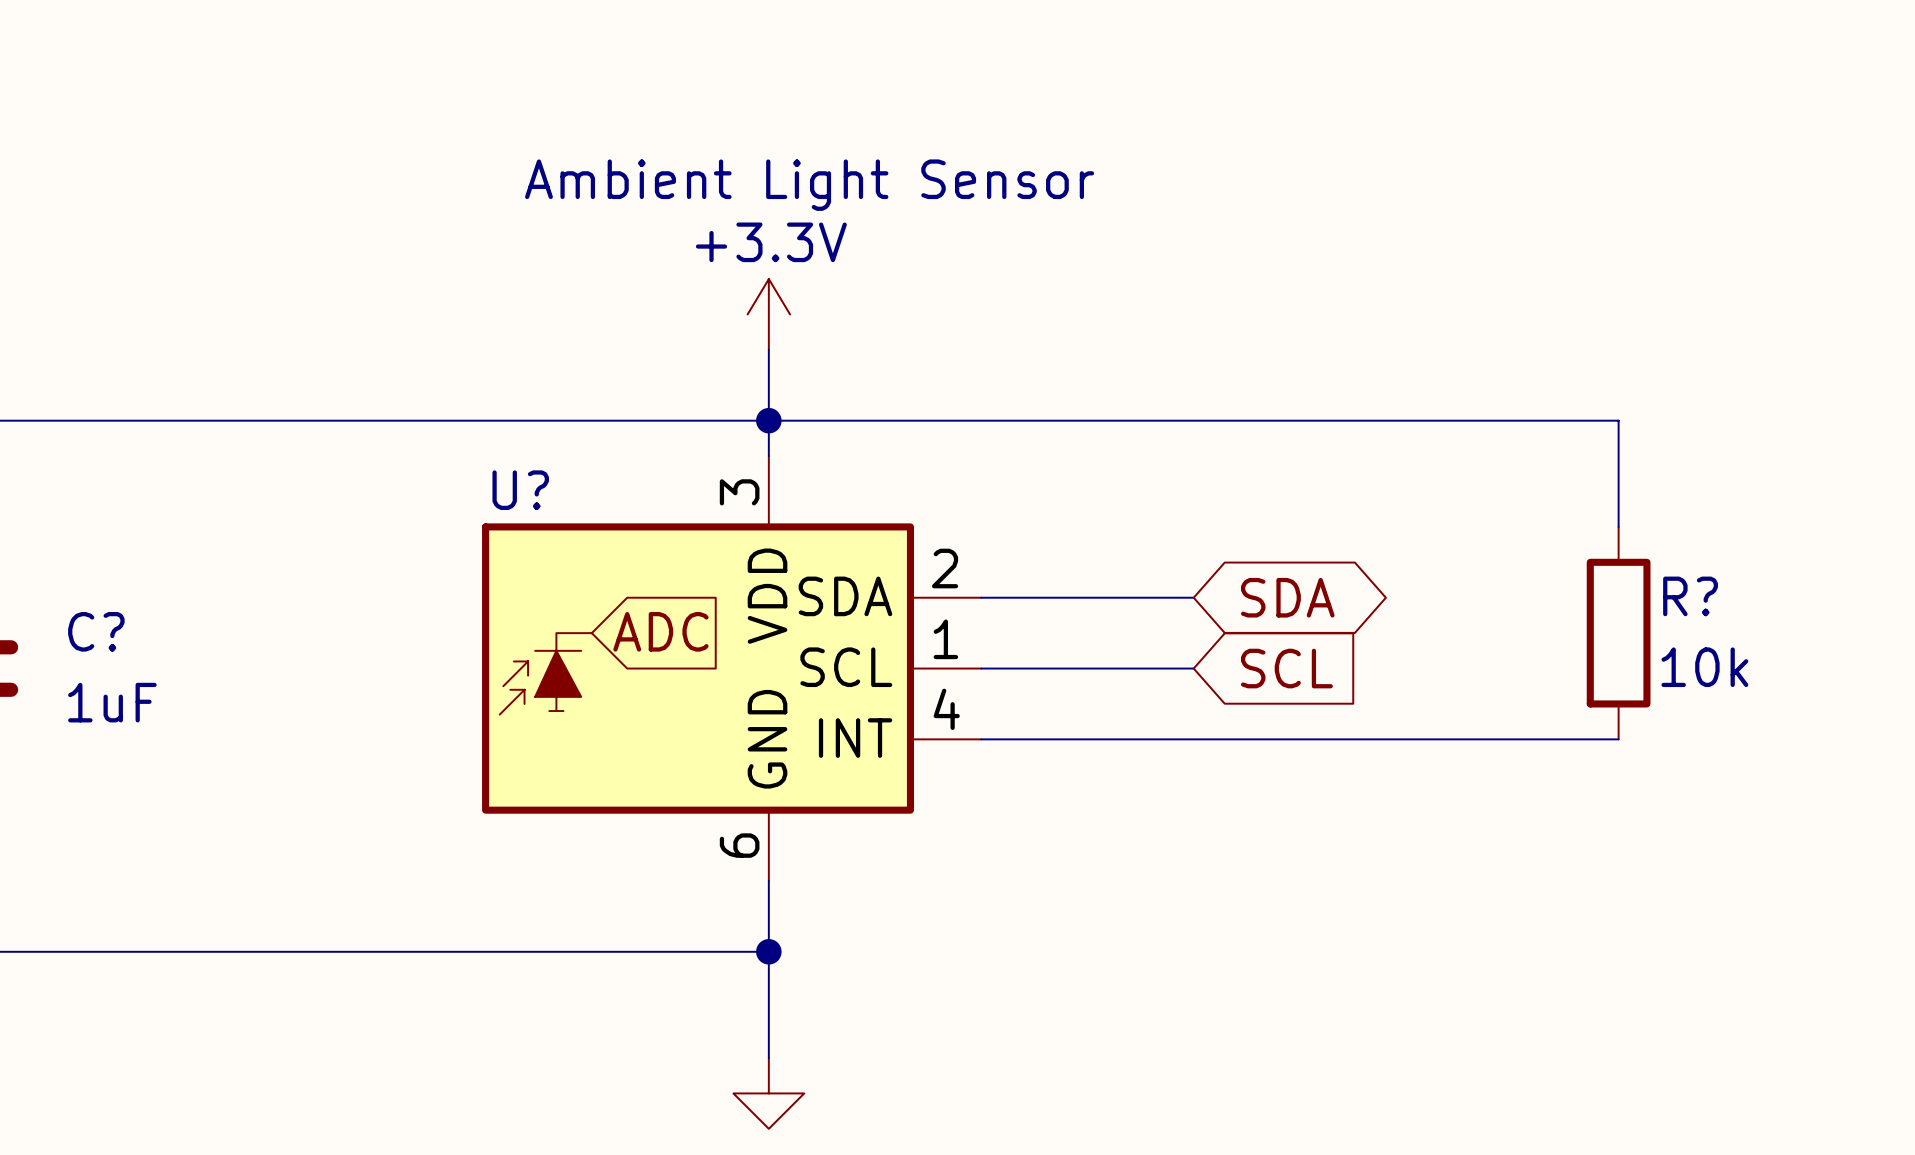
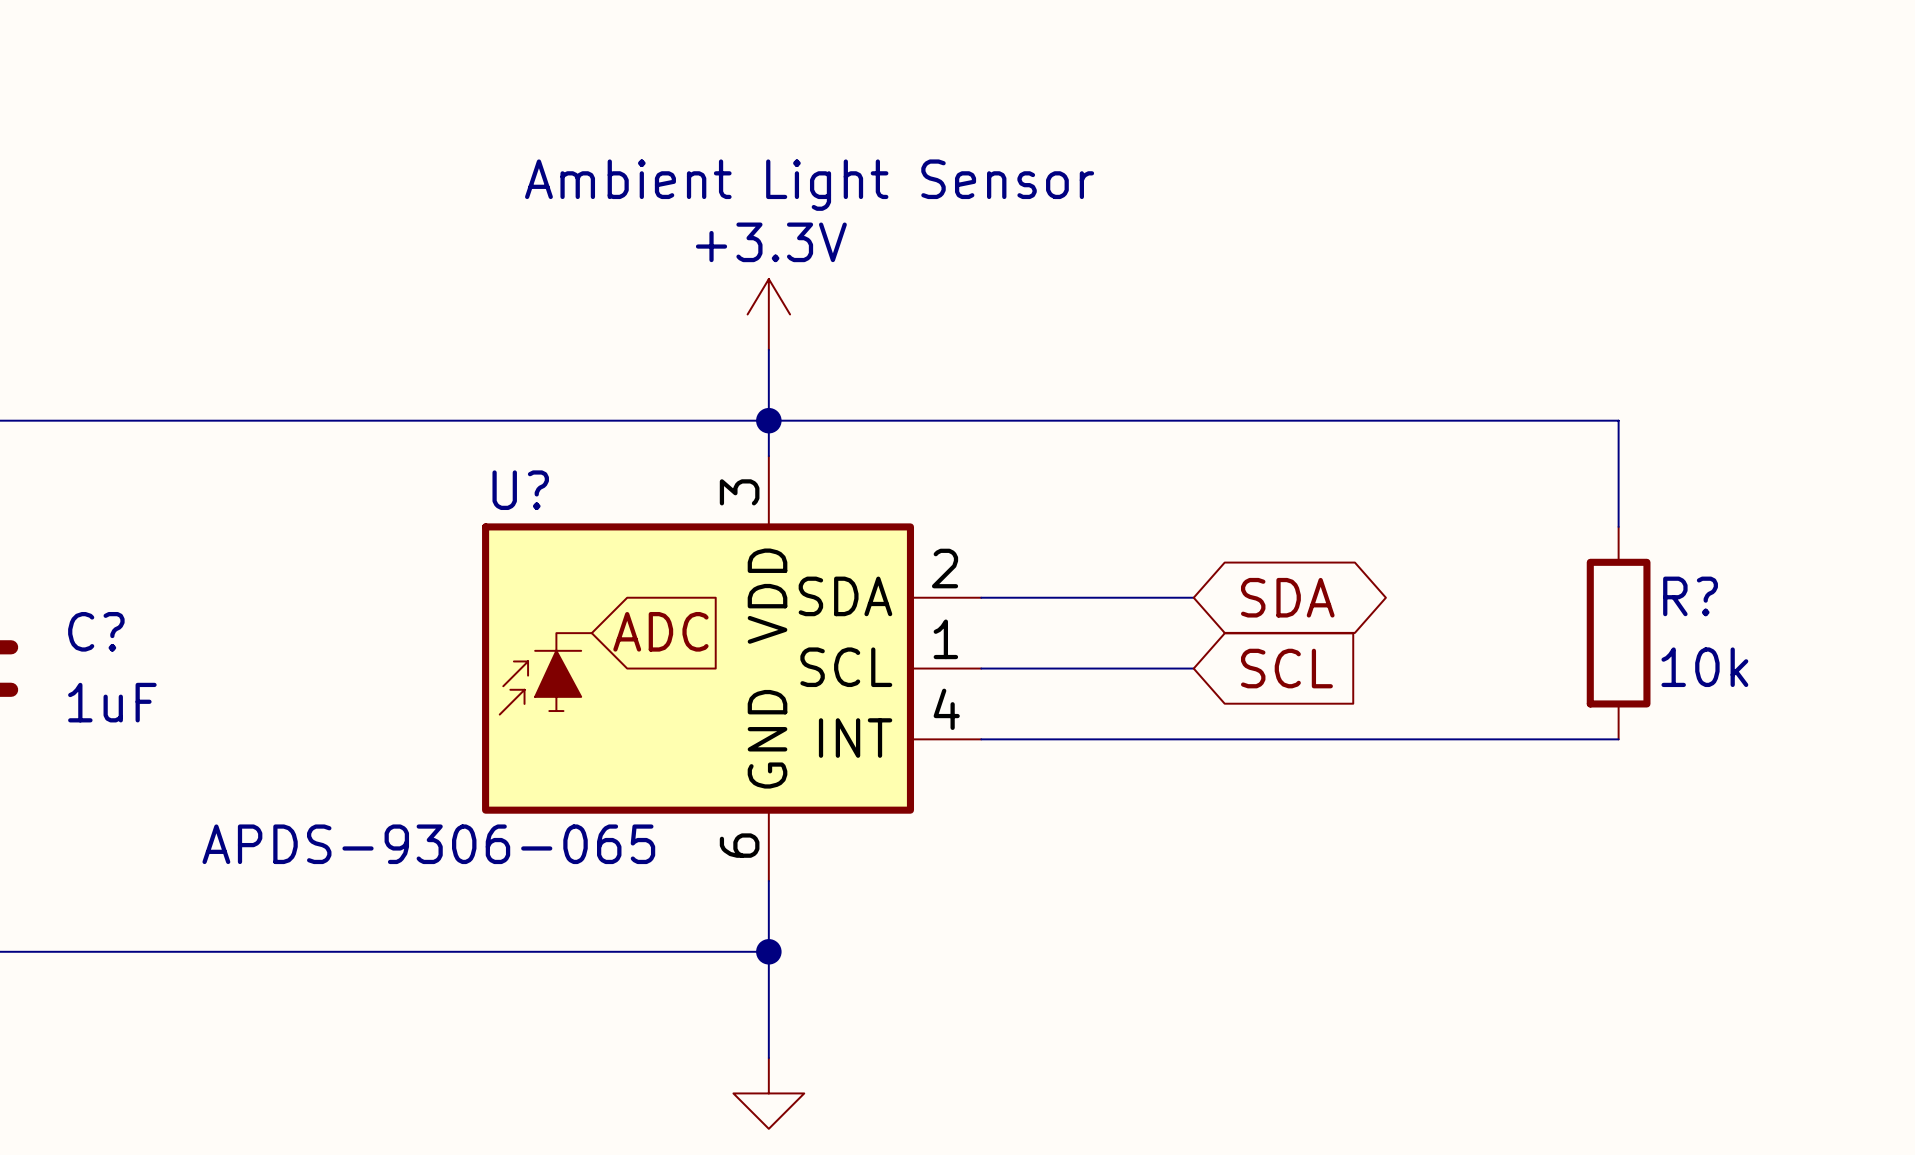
U? value: none -> APDS-9306-065 (428, 844)

